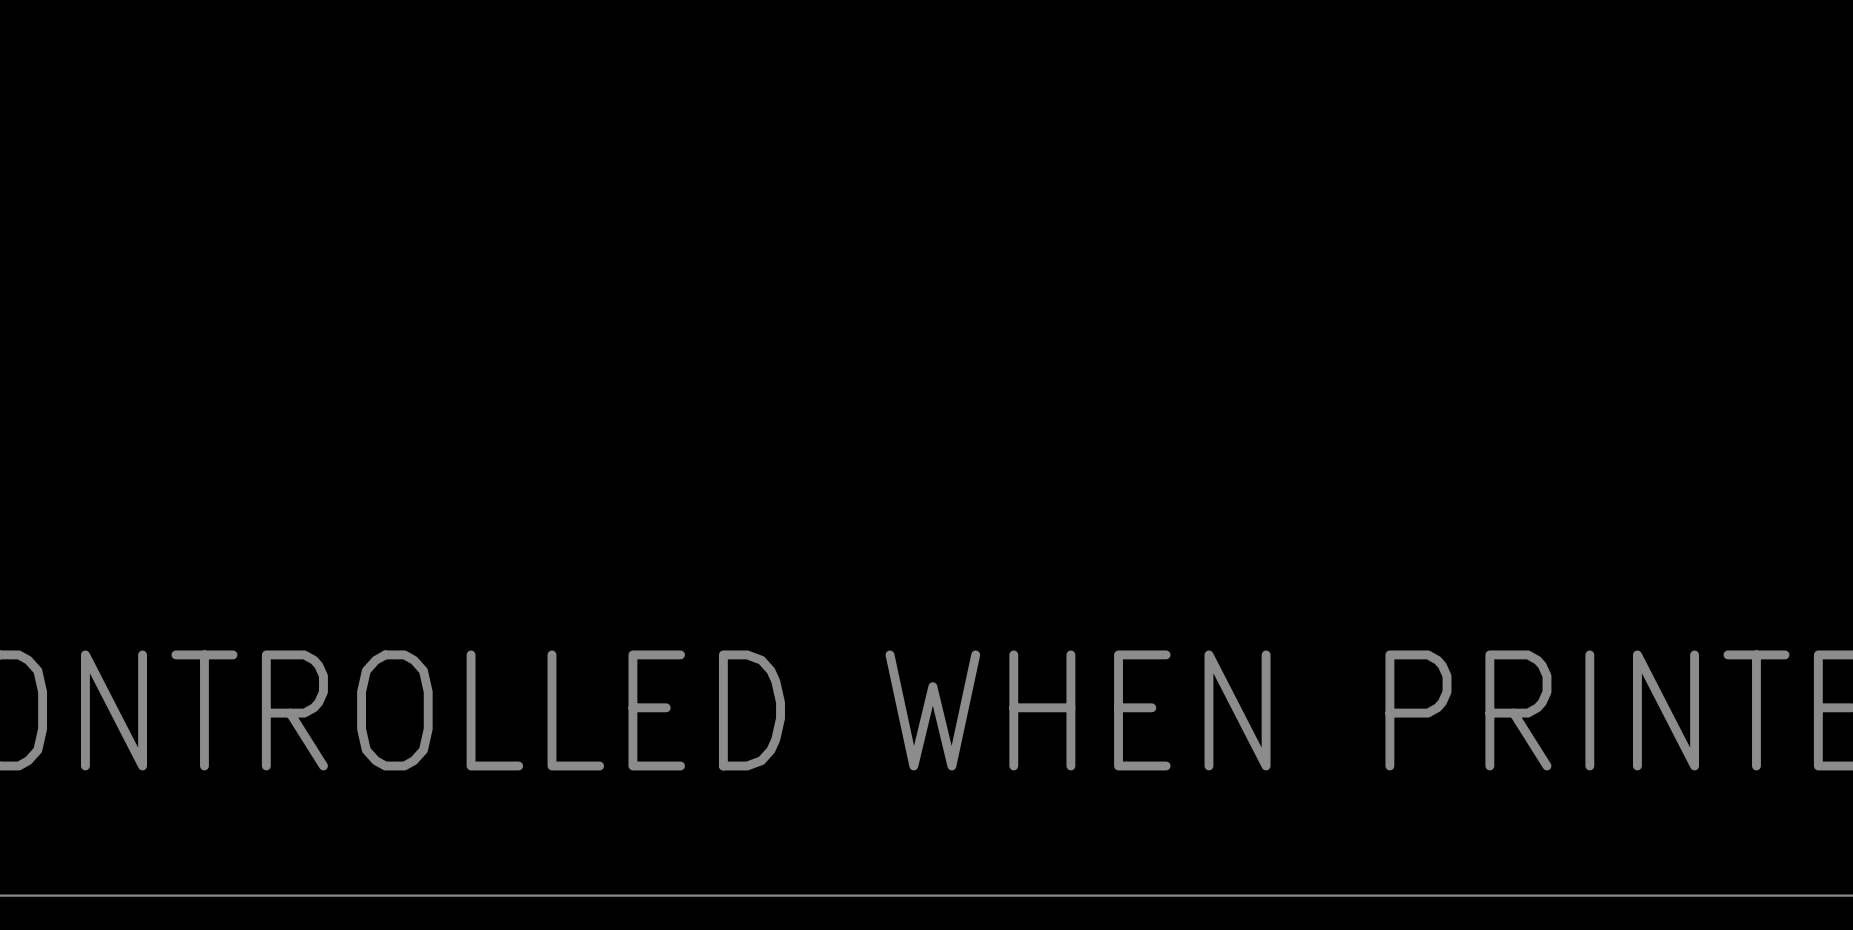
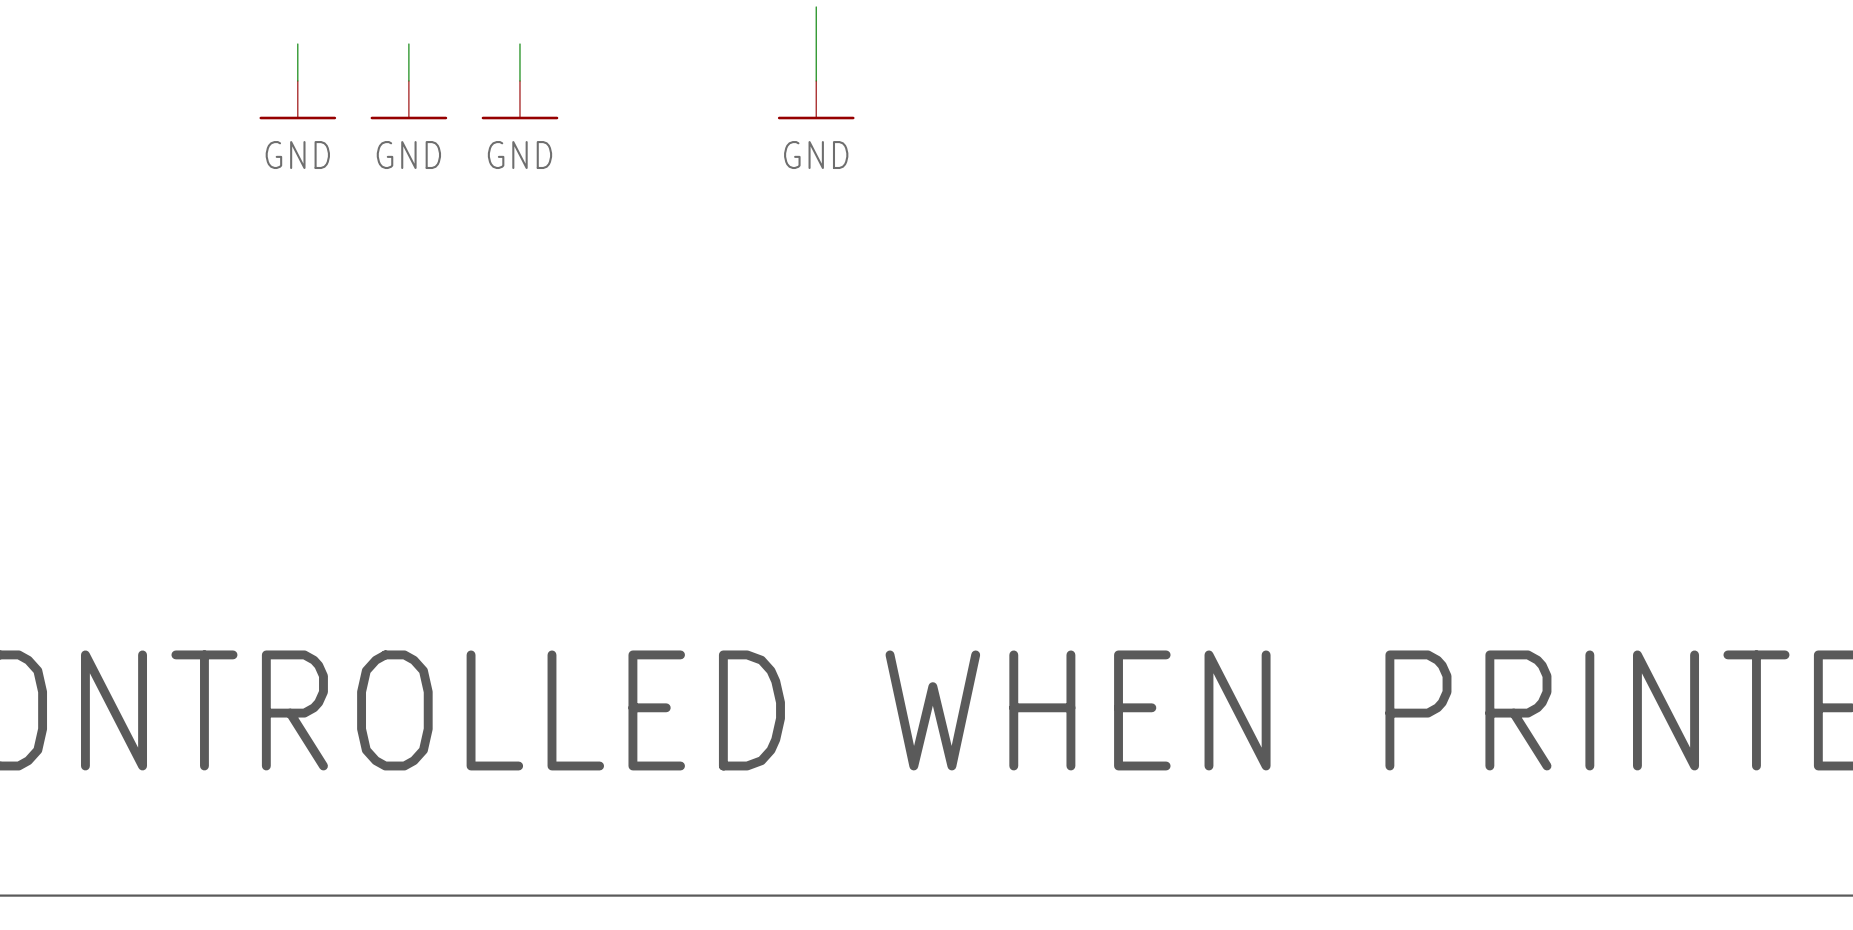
wire: none -> (816, 6) (816, 80)
wire: none -> (297, 43) (297, 80)
wire: none -> (408, 43) (408, 80)
wire: none -> (519, 43) (519, 80)
power symbol: none -> GND (297, 100)
power symbol: none -> GND (408, 100)
power symbol: none -> GND (519, 100)
power symbol: none -> GND (816, 100)

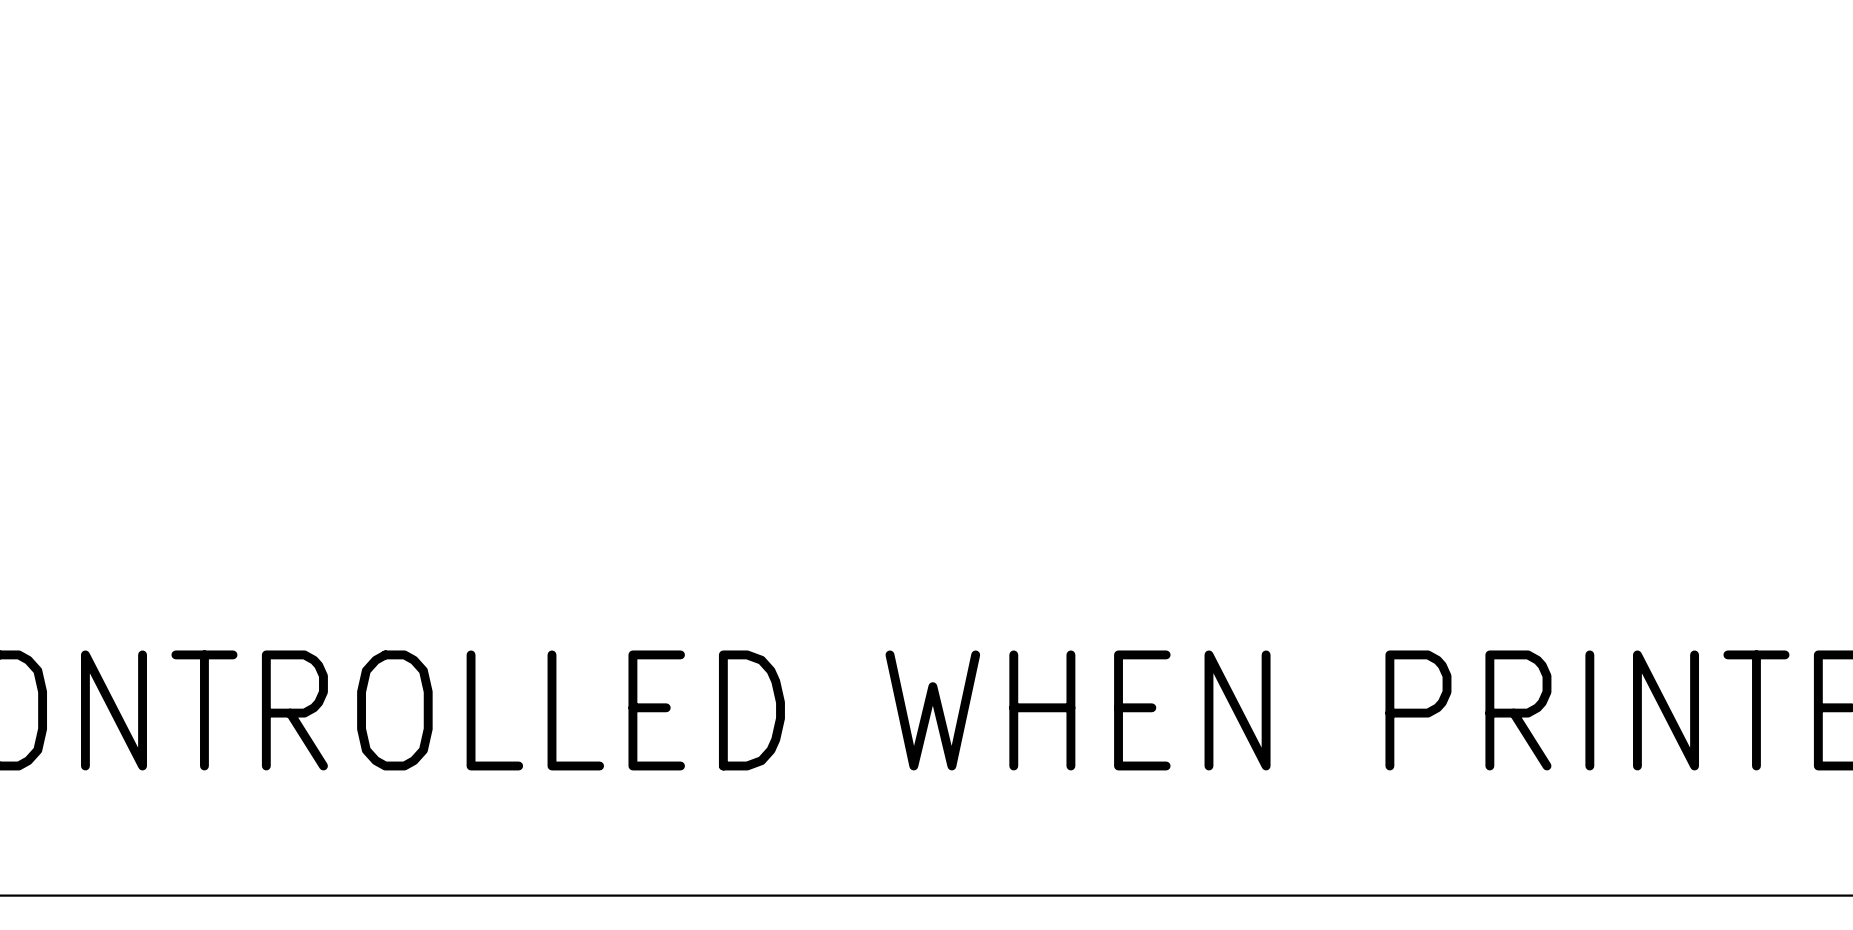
wire: (816, 6) (816, 80) -> none
wire: (297, 43) (297, 80) -> none
wire: (408, 43) (408, 80) -> none
wire: (519, 43) (519, 80) -> none
power symbol: GND (297, 100) -> none
power symbol: GND (408, 100) -> none
power symbol: GND (519, 100) -> none
power symbol: GND (816, 100) -> none

